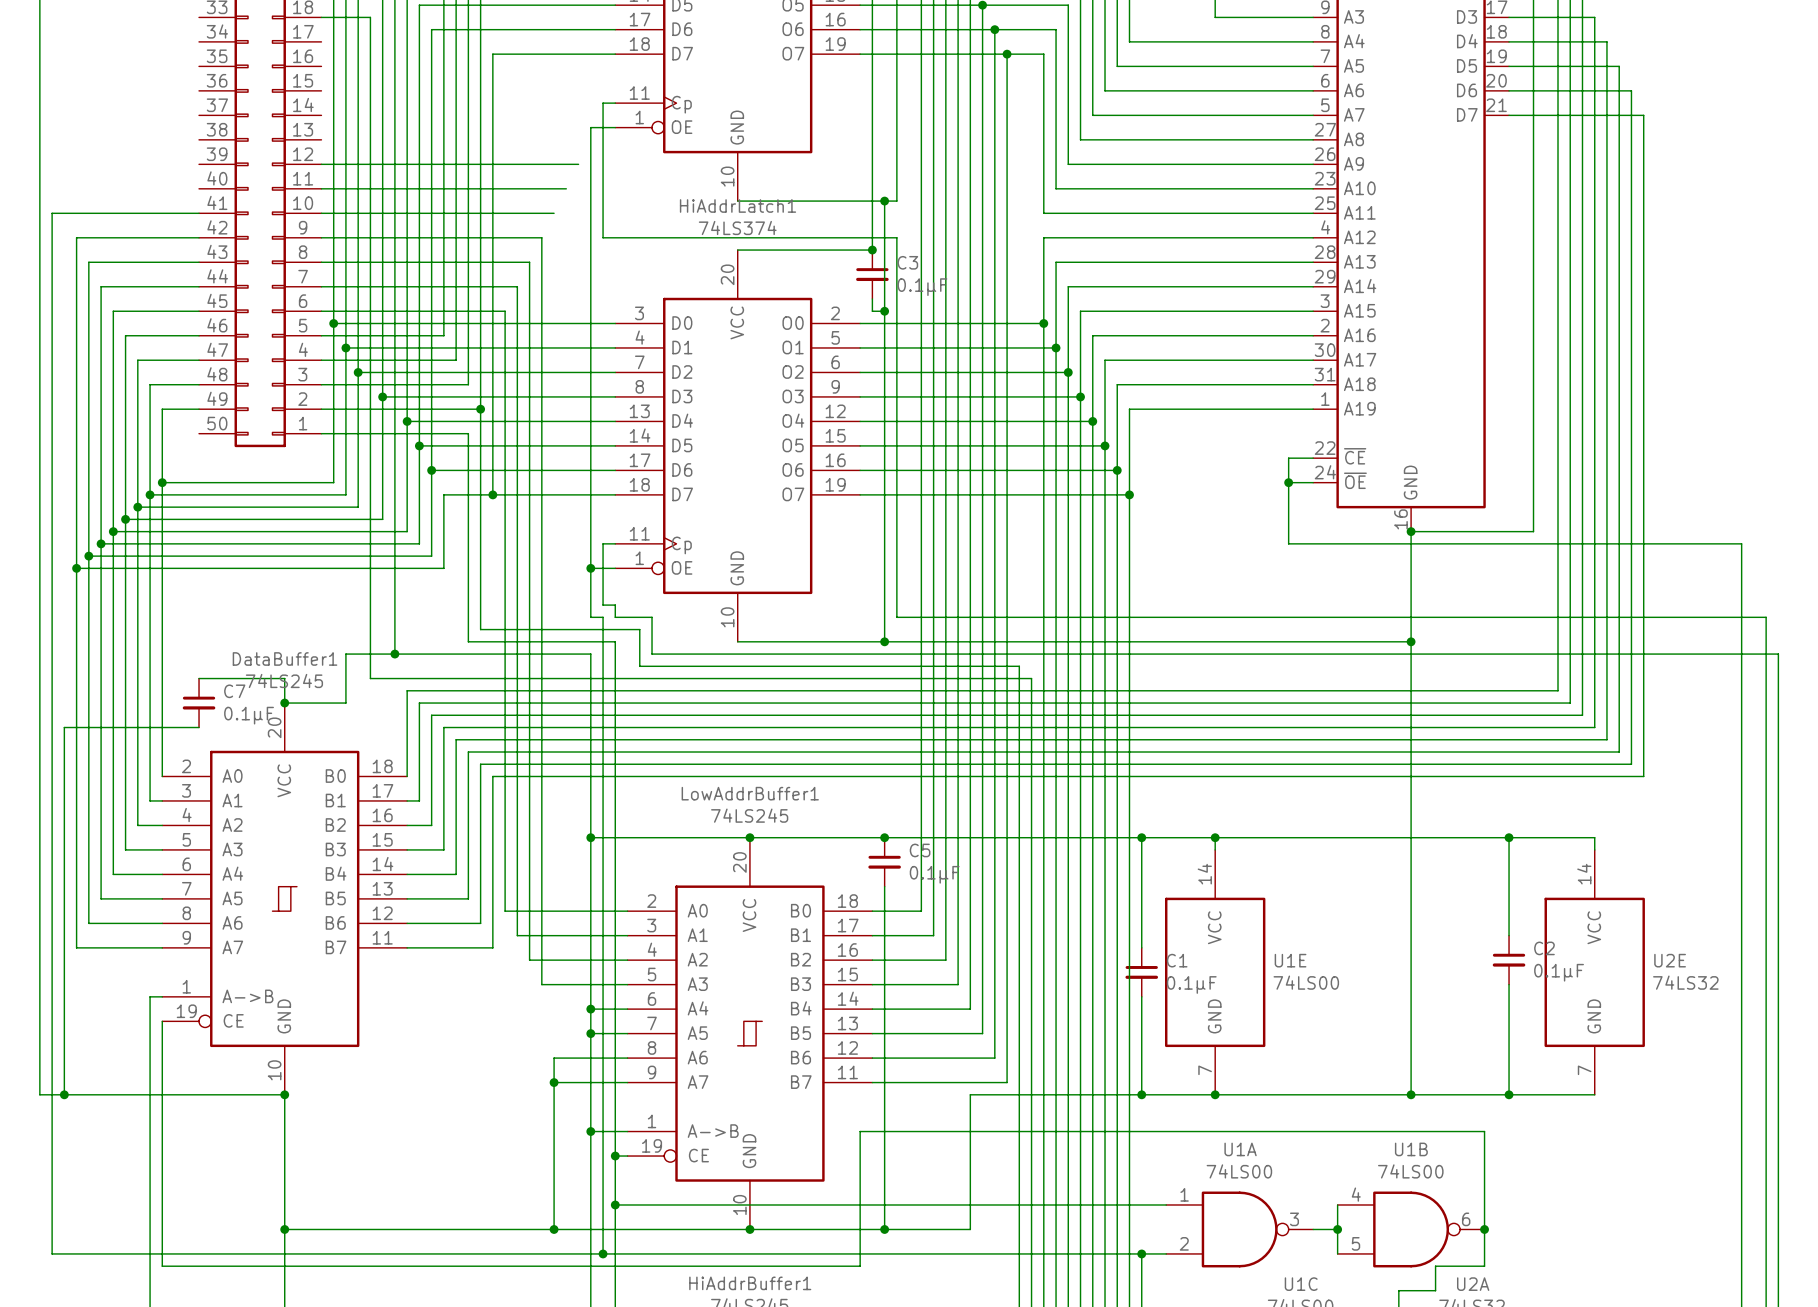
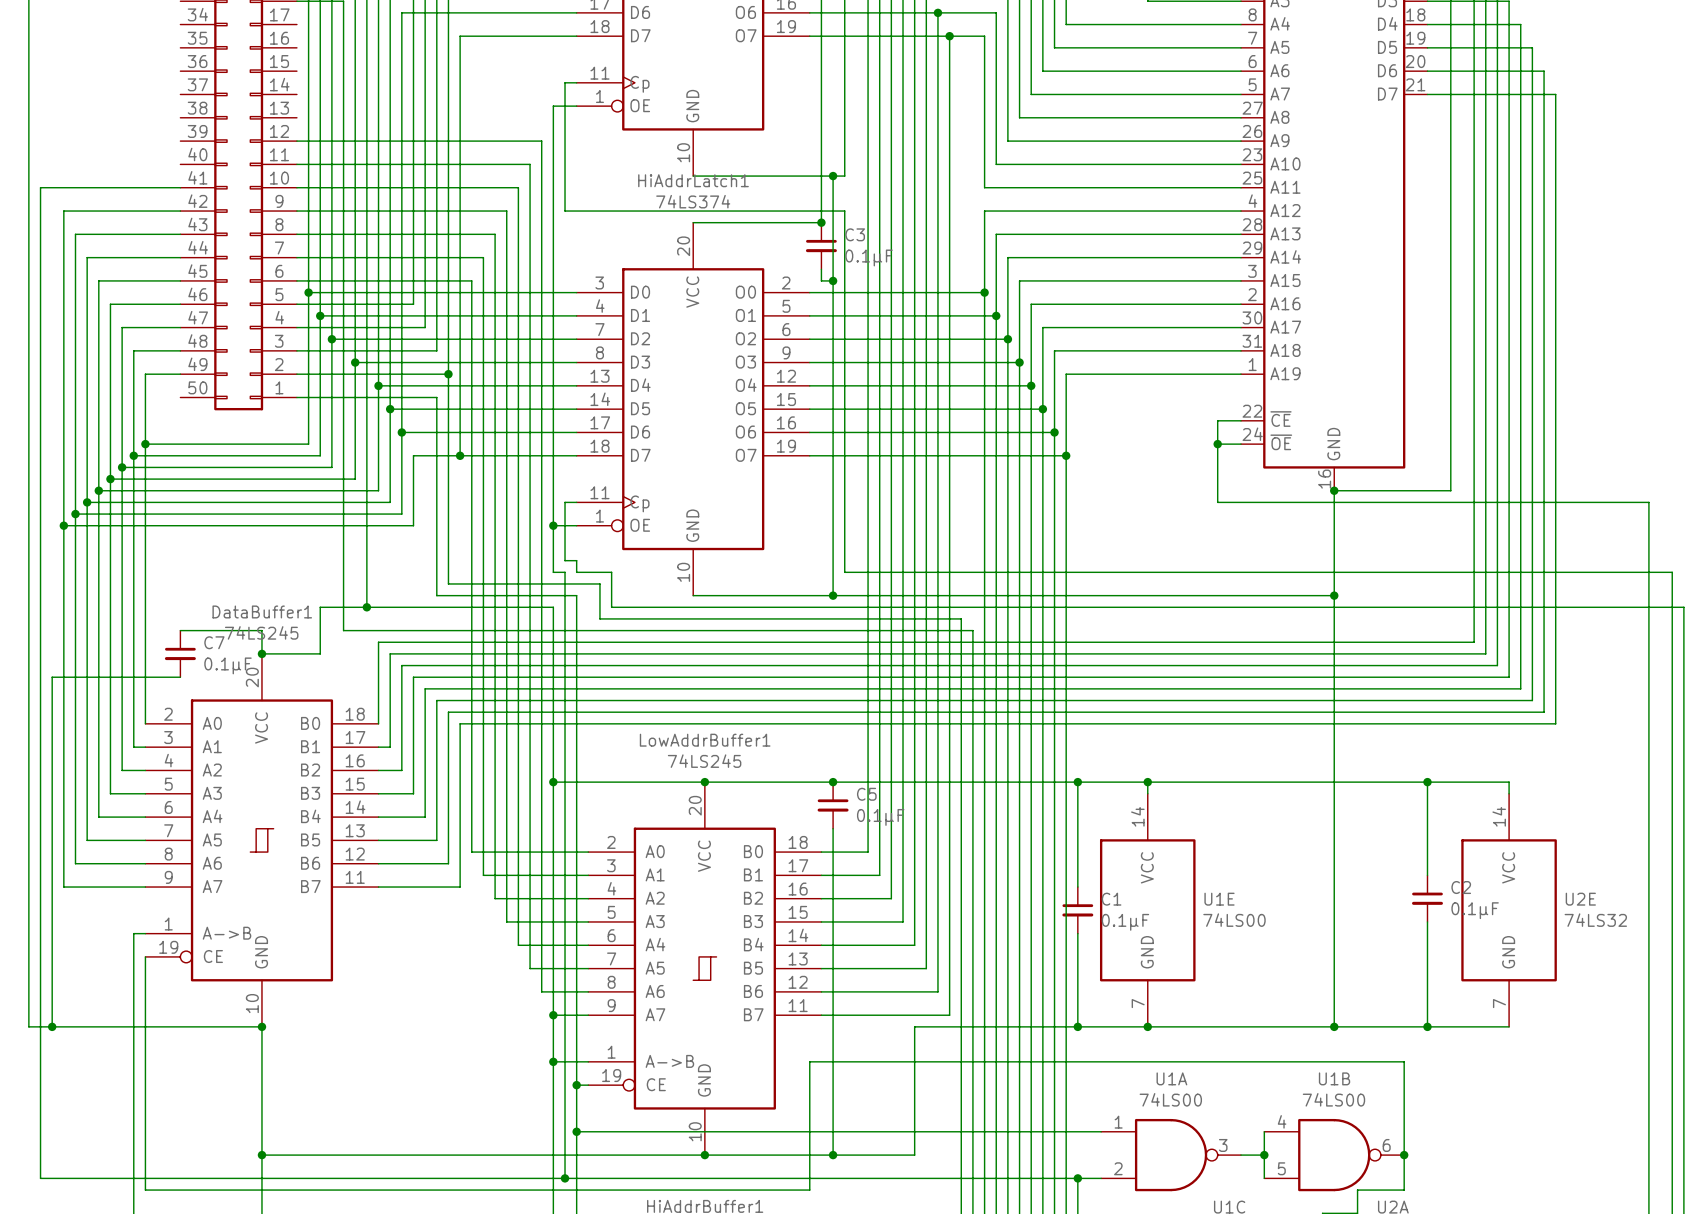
wire: none -> (530, 164) (530, 968) (553, 968)
wire: none -> (518, 187) (518, 945) (553, 945)
junction: (590, 1009) -> none
junction: (590, 1033) -> none
wire: (578, 1058) (554, 1058) (554, 1229) -> (541, 991) (541, 141)
wire: (554, 1082) (590, 1082) -> none
junction: (554, 1082) -> none
junction: none -> (553, 1015)
junction: (554, 1229) -> none

